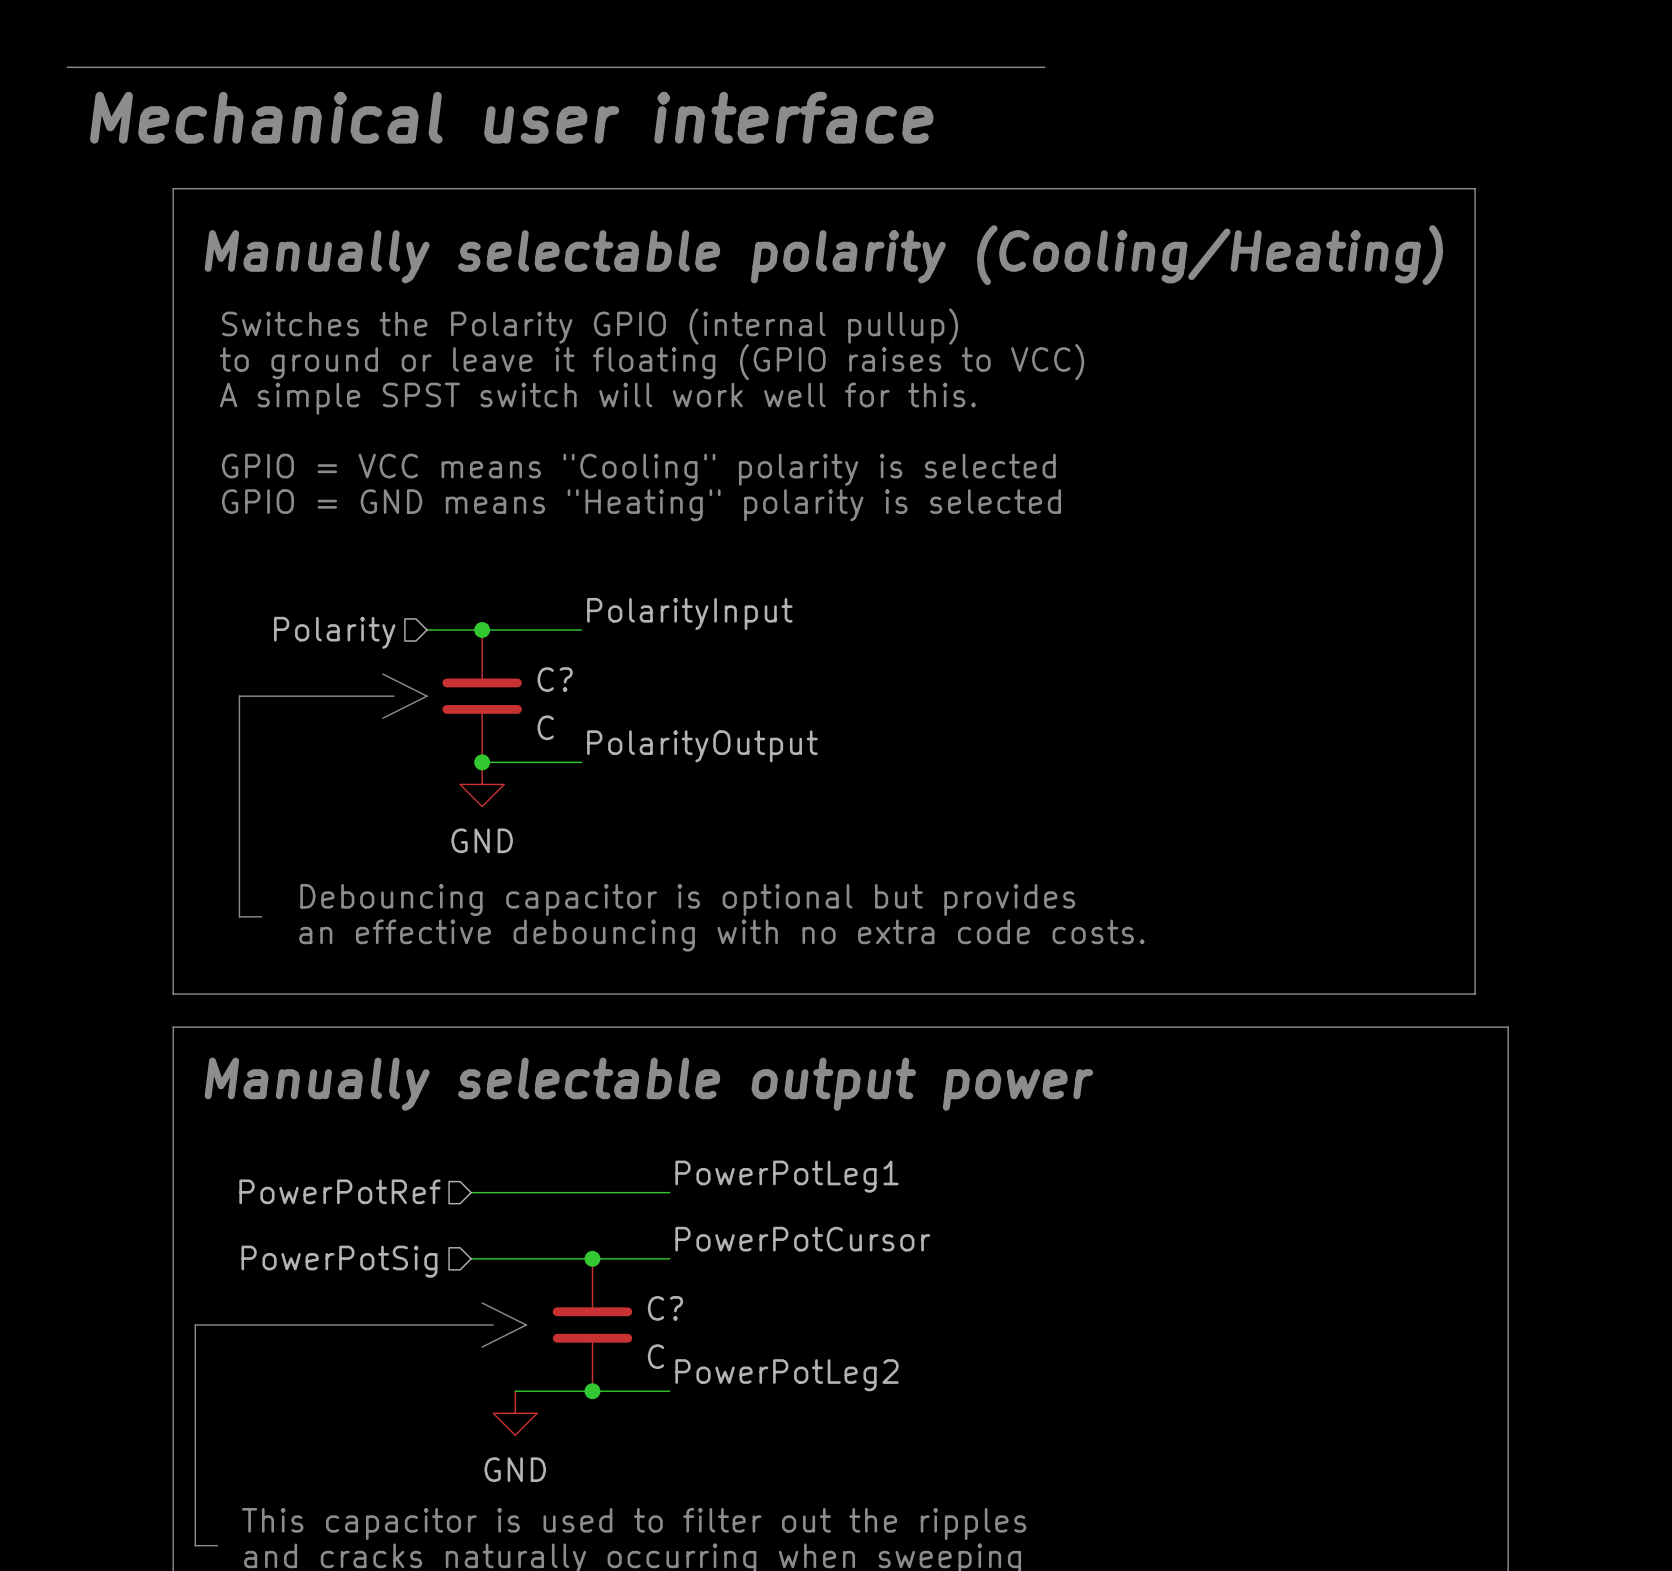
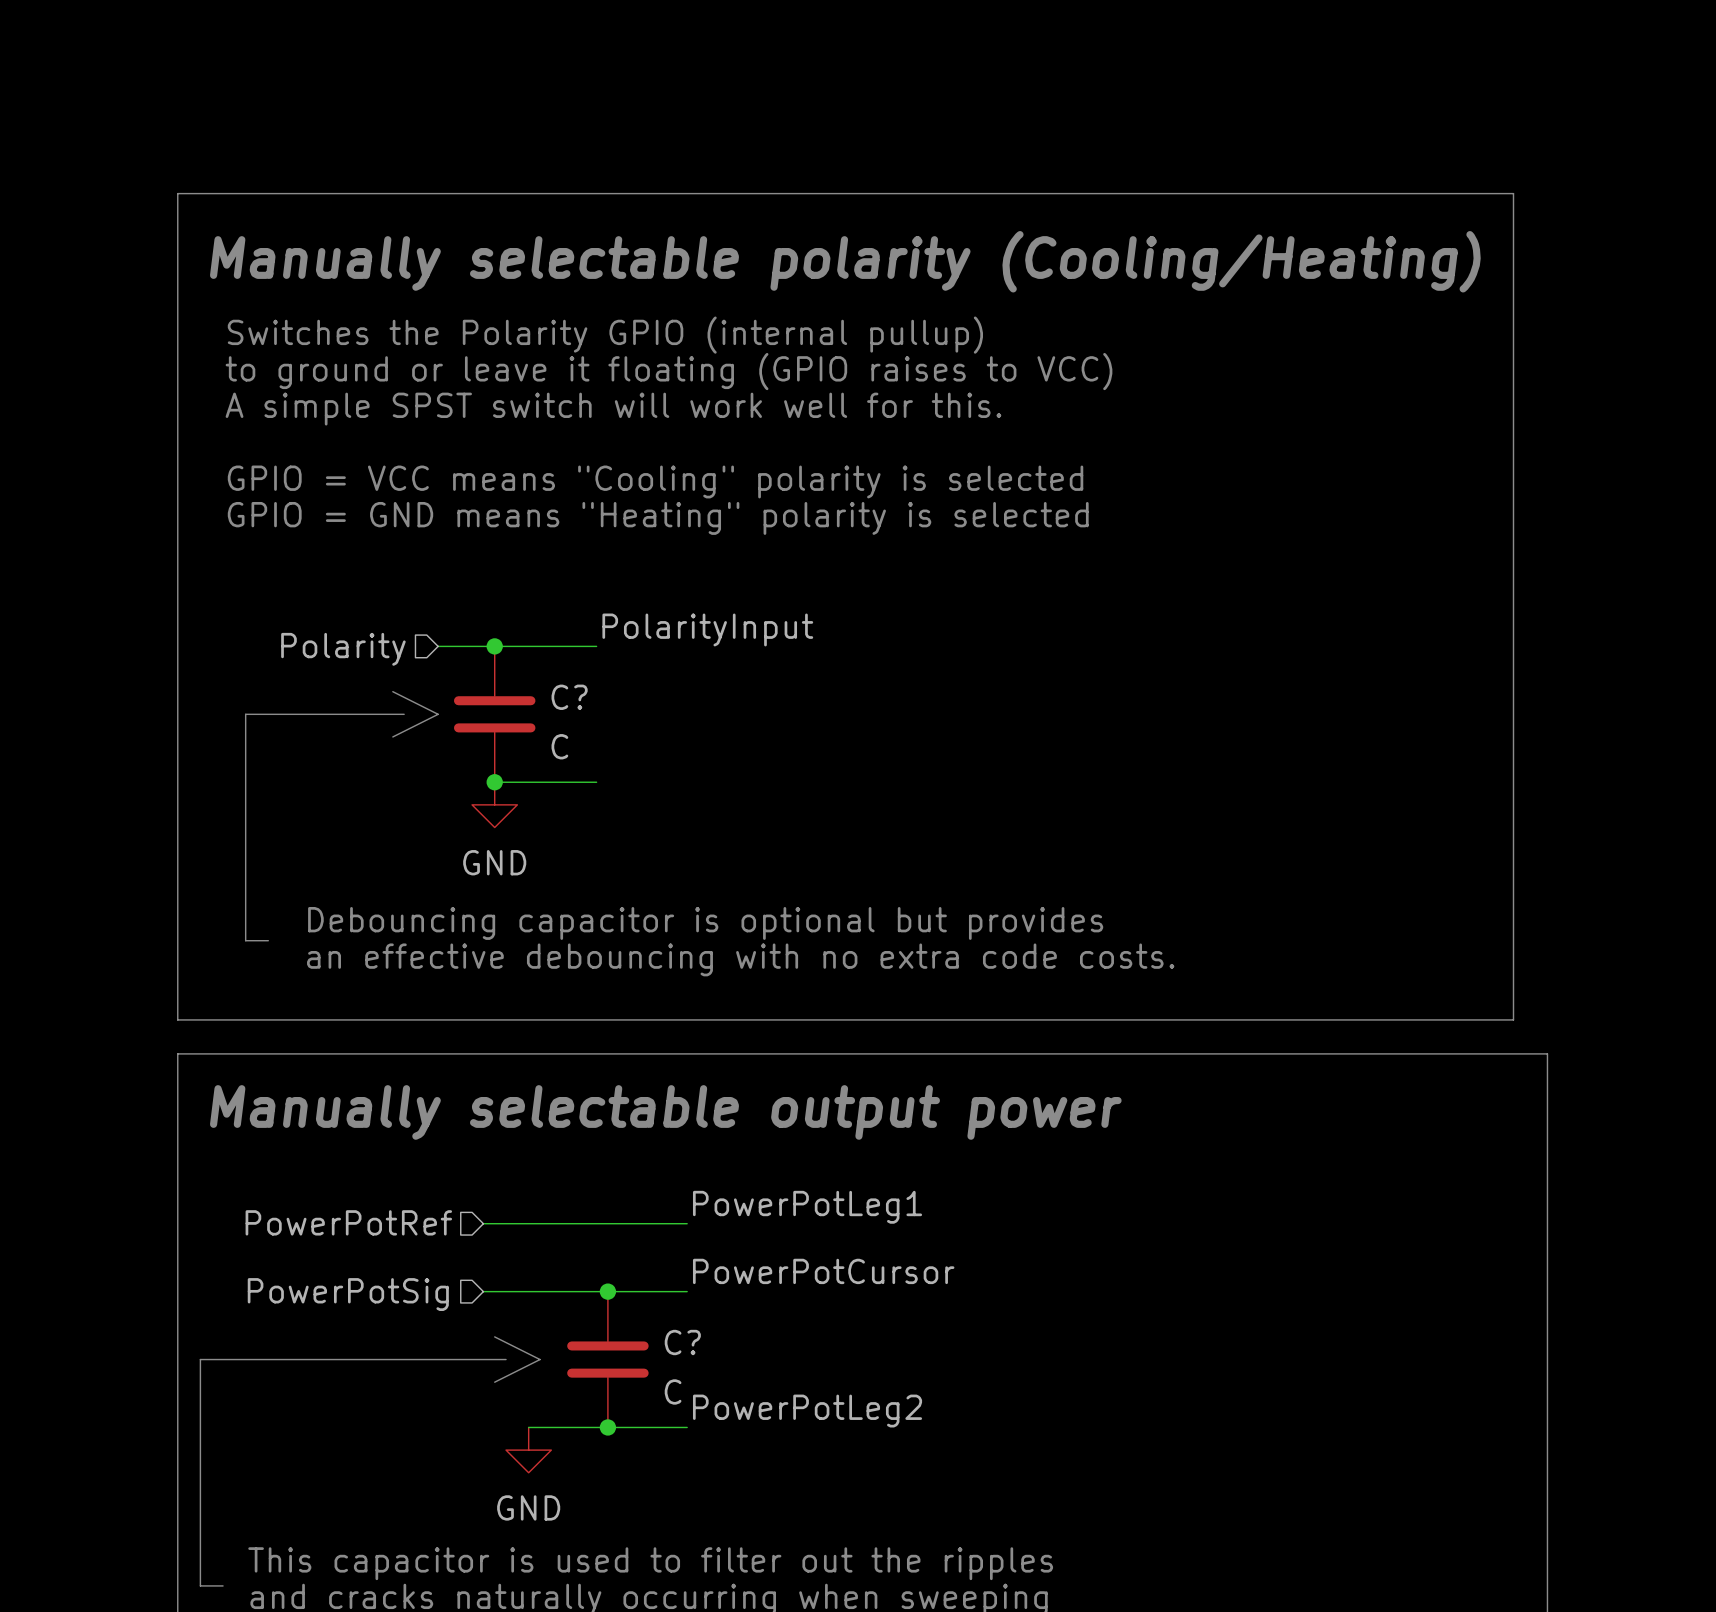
line: (67, 67) (1044, 67) -> none
text: Mechanical user interface (511, 117) -> none
label: PolarityOutput (702, 746) -> none

